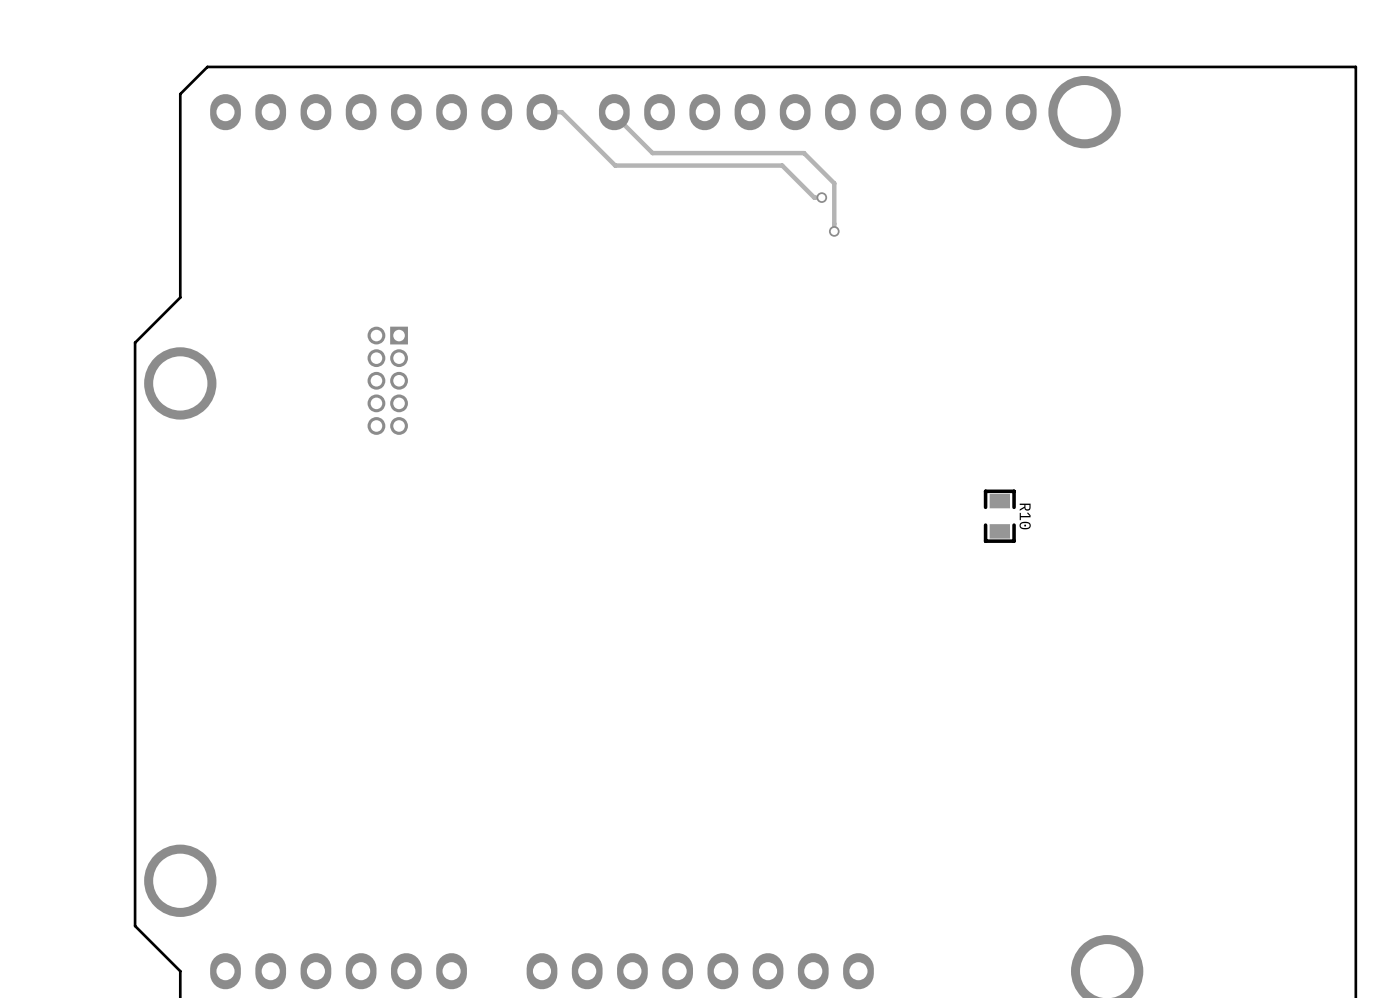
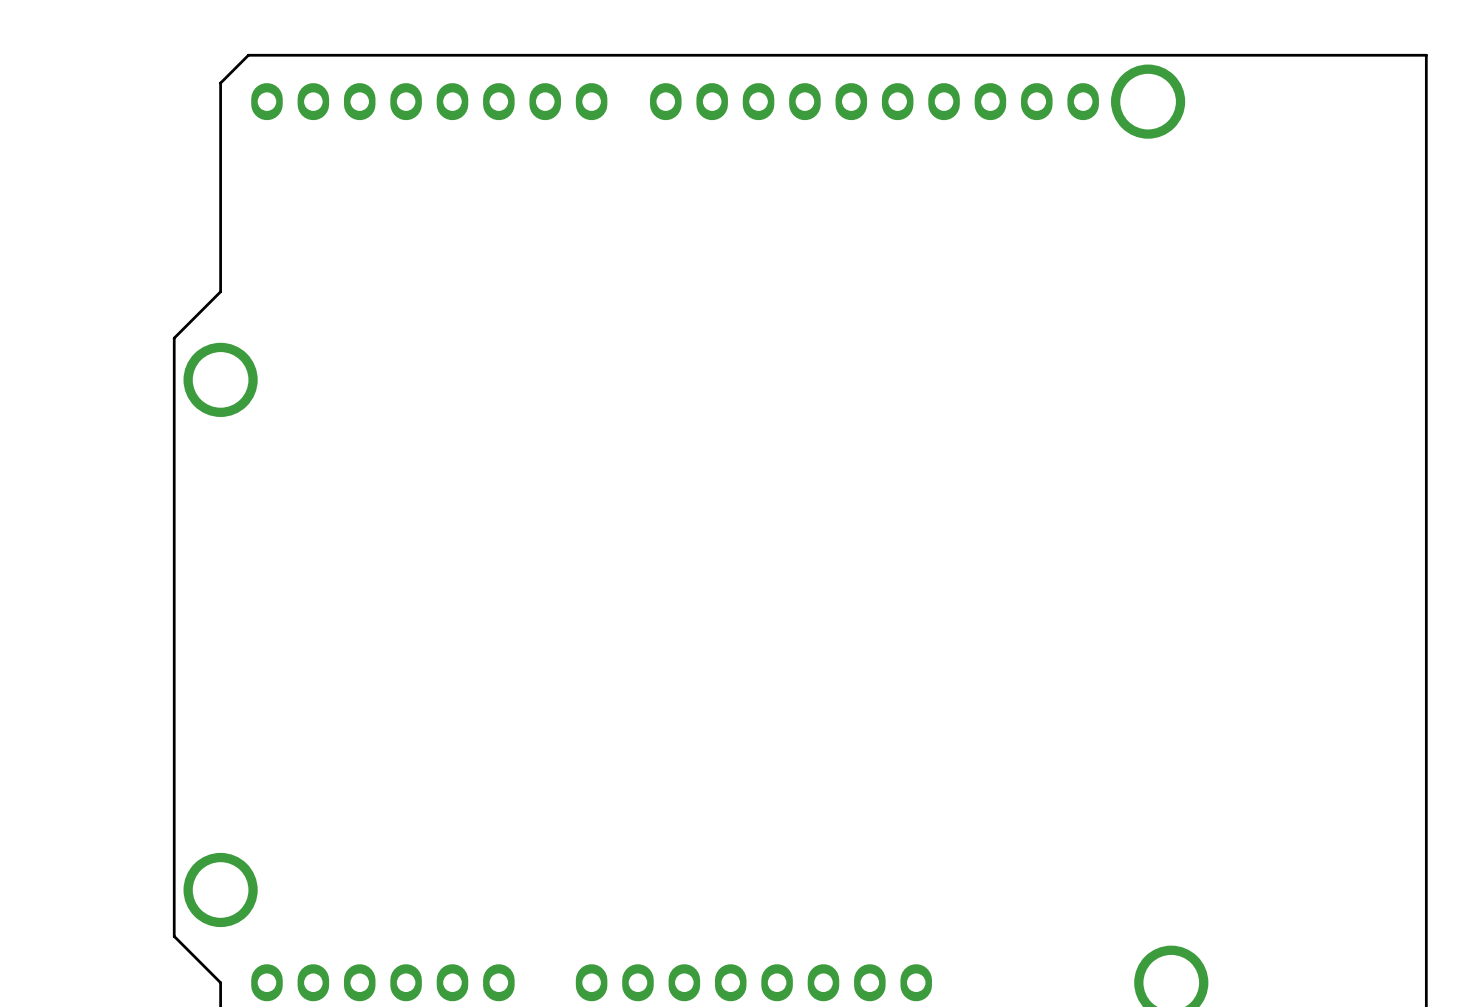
track: (541, 112) (561, 112) (615, 165) (782, 165) (814, 197) (821, 197) -> none
track: (614, 112) (614, 114) (652, 153) (804, 153) (834, 183) (834, 231) -> none
via: (821, 197) -> none
via: (834, 231) -> none
part: (387, 380) -> none
R10: (999, 516) -> none

